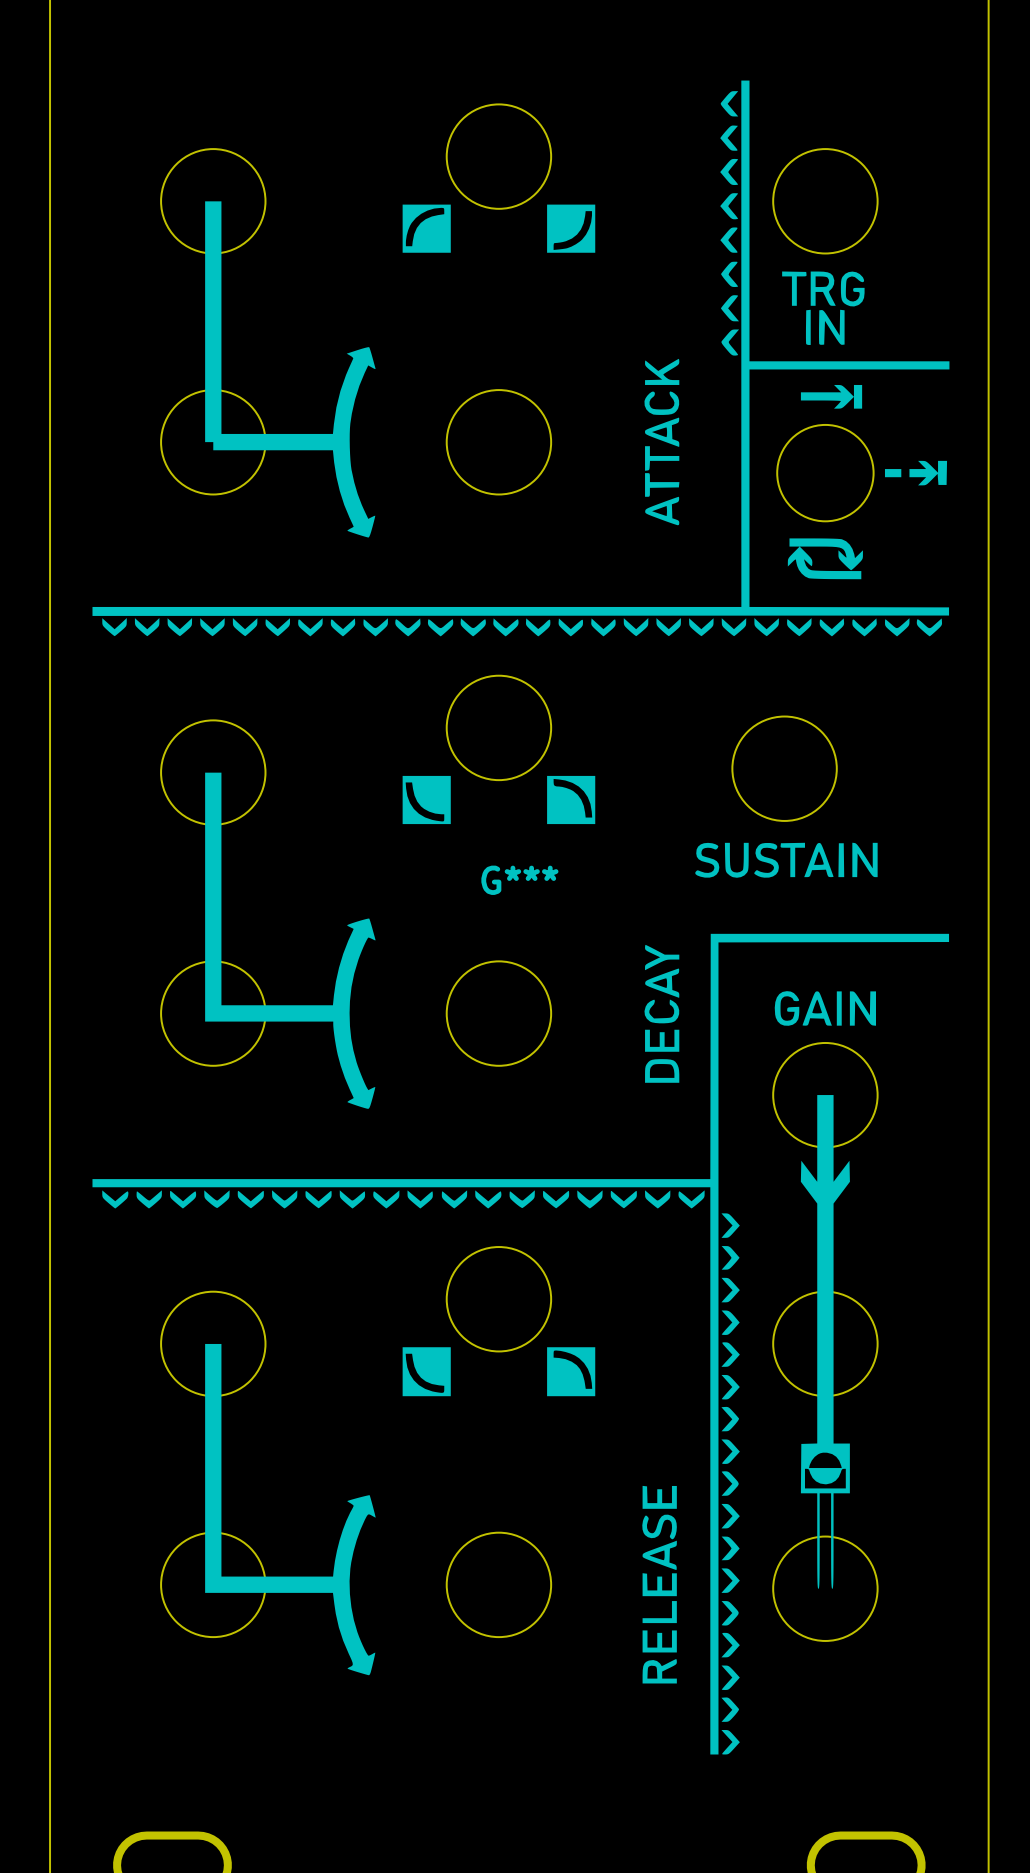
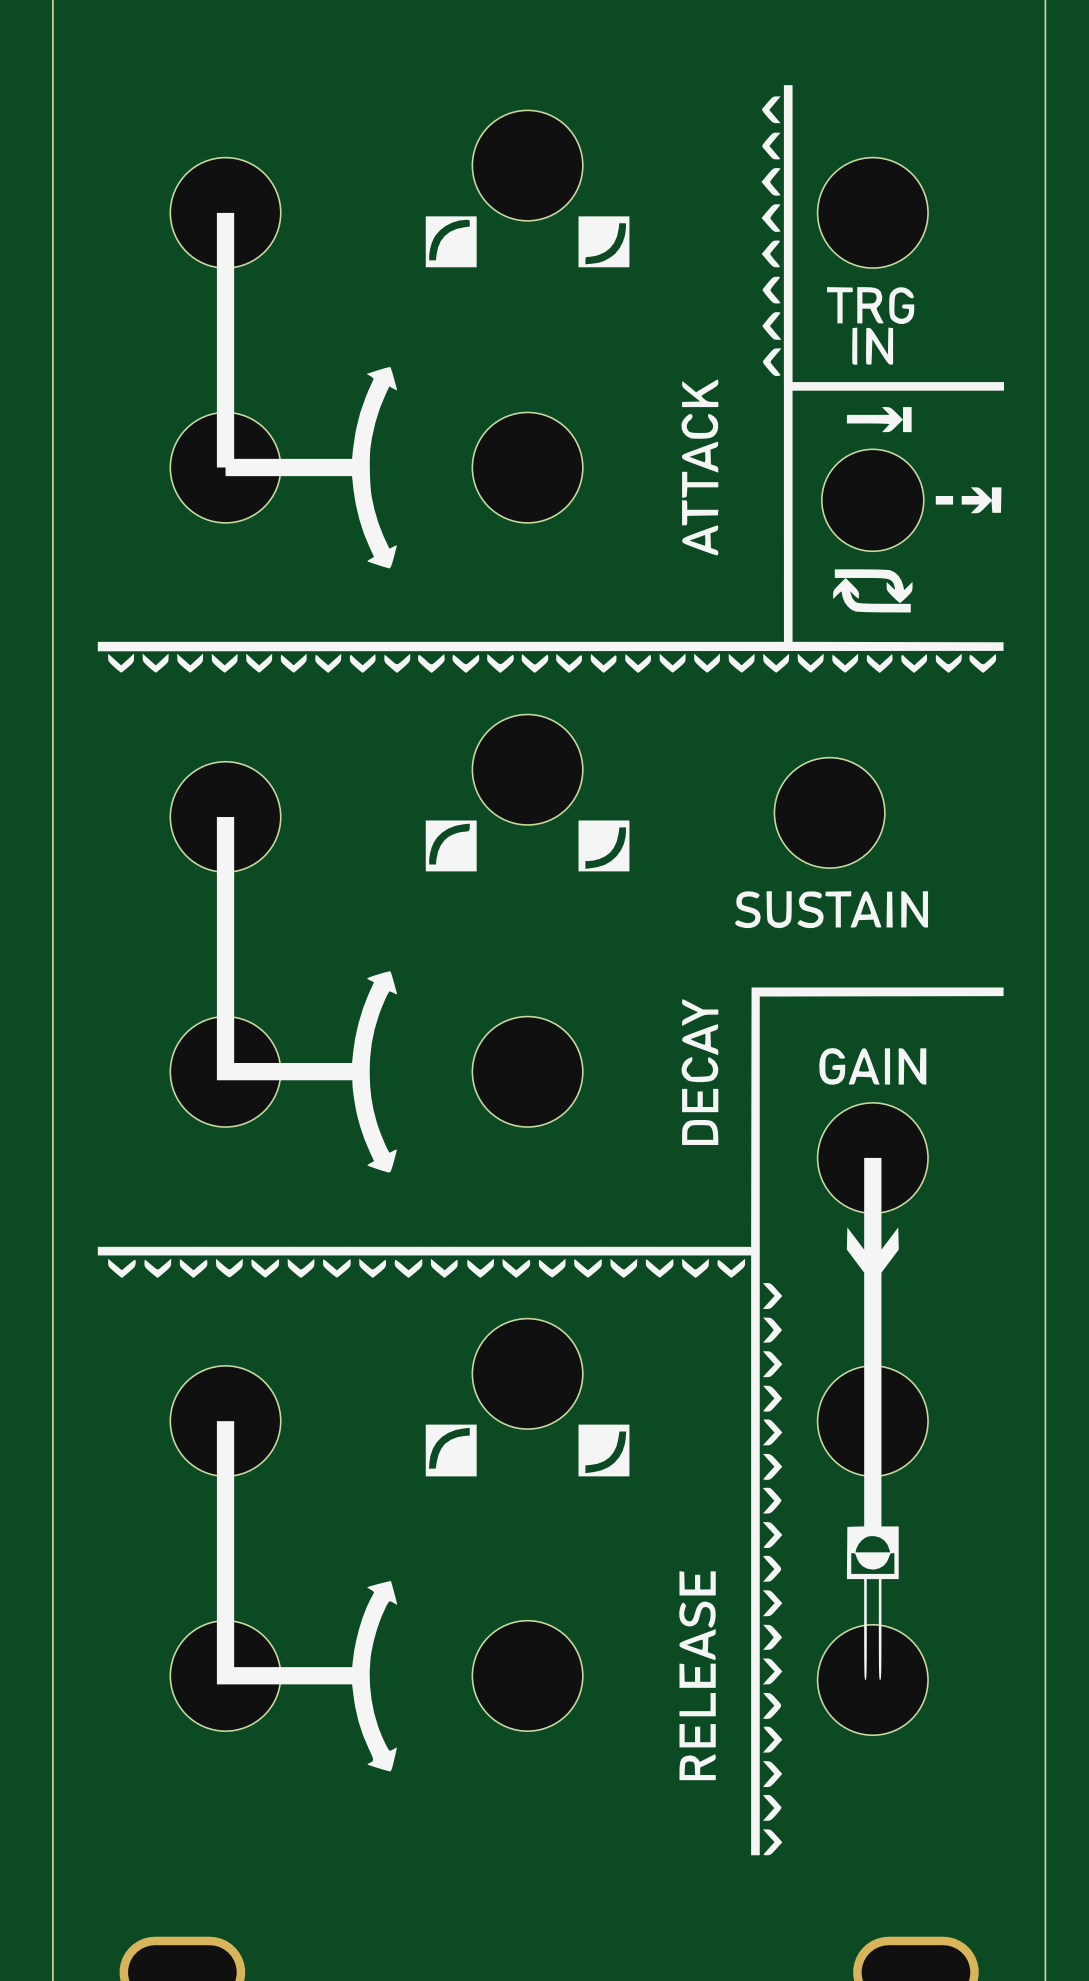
drawing: none -> [97, 85, 1004, 1856]
G***: (520, 917) -> none

